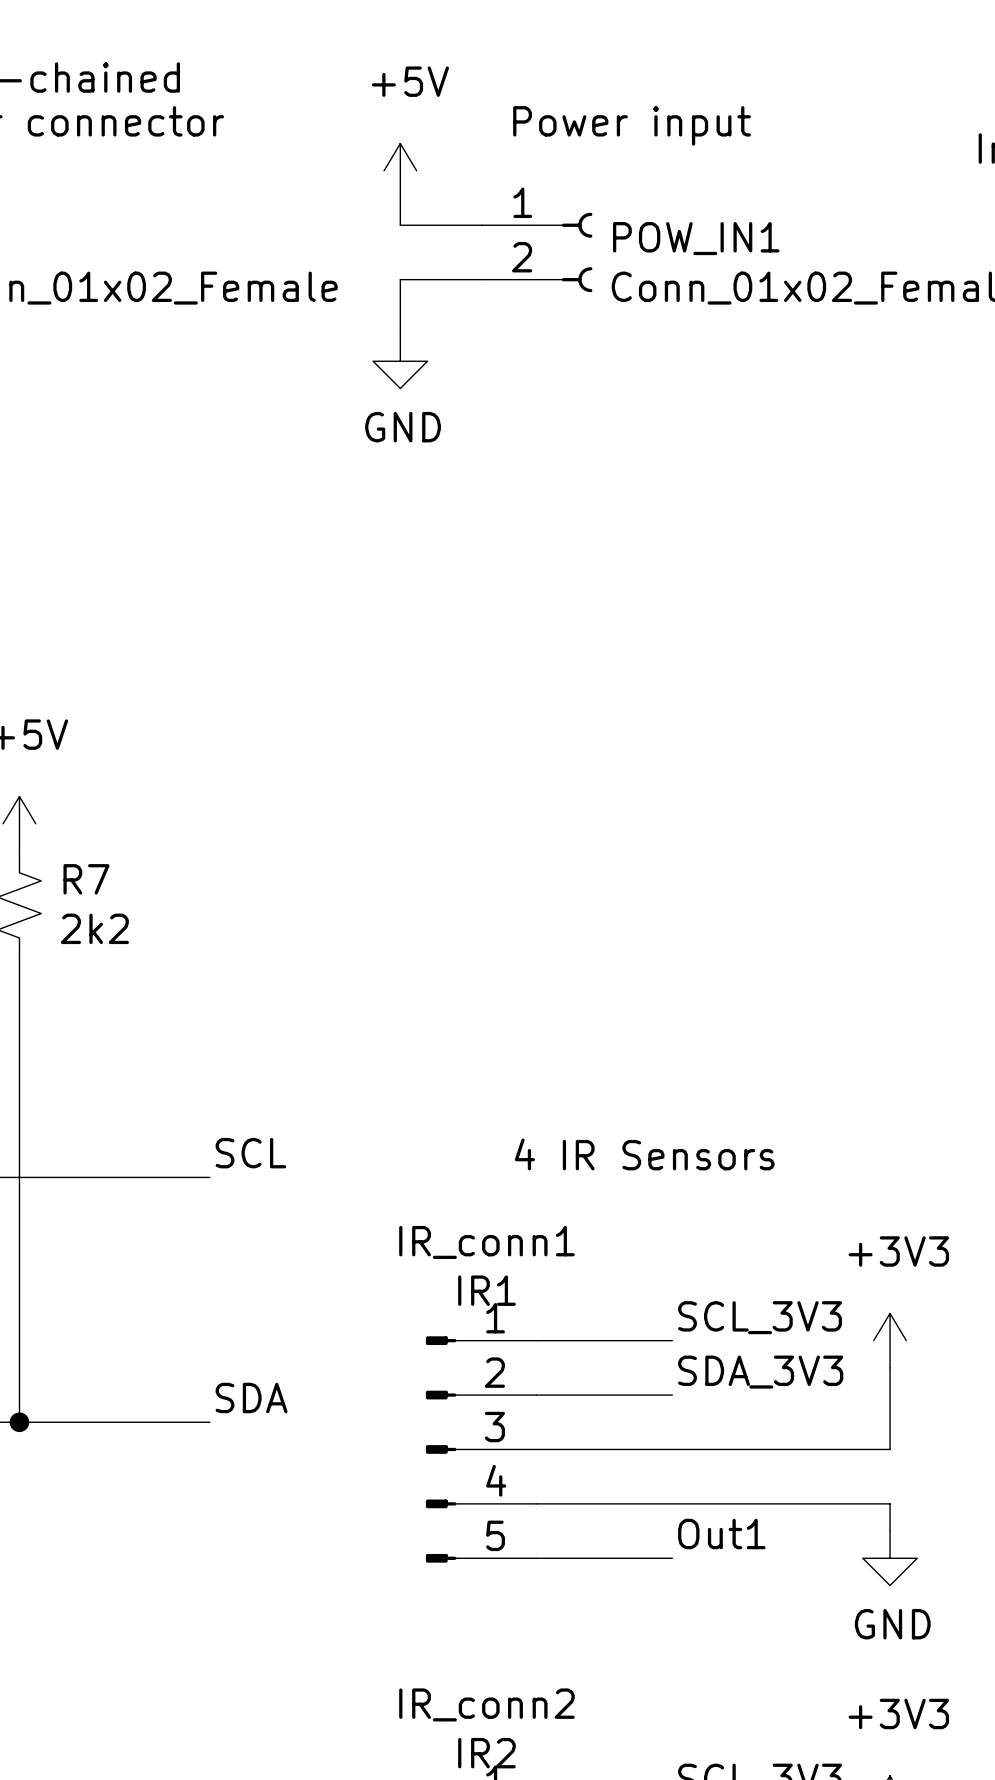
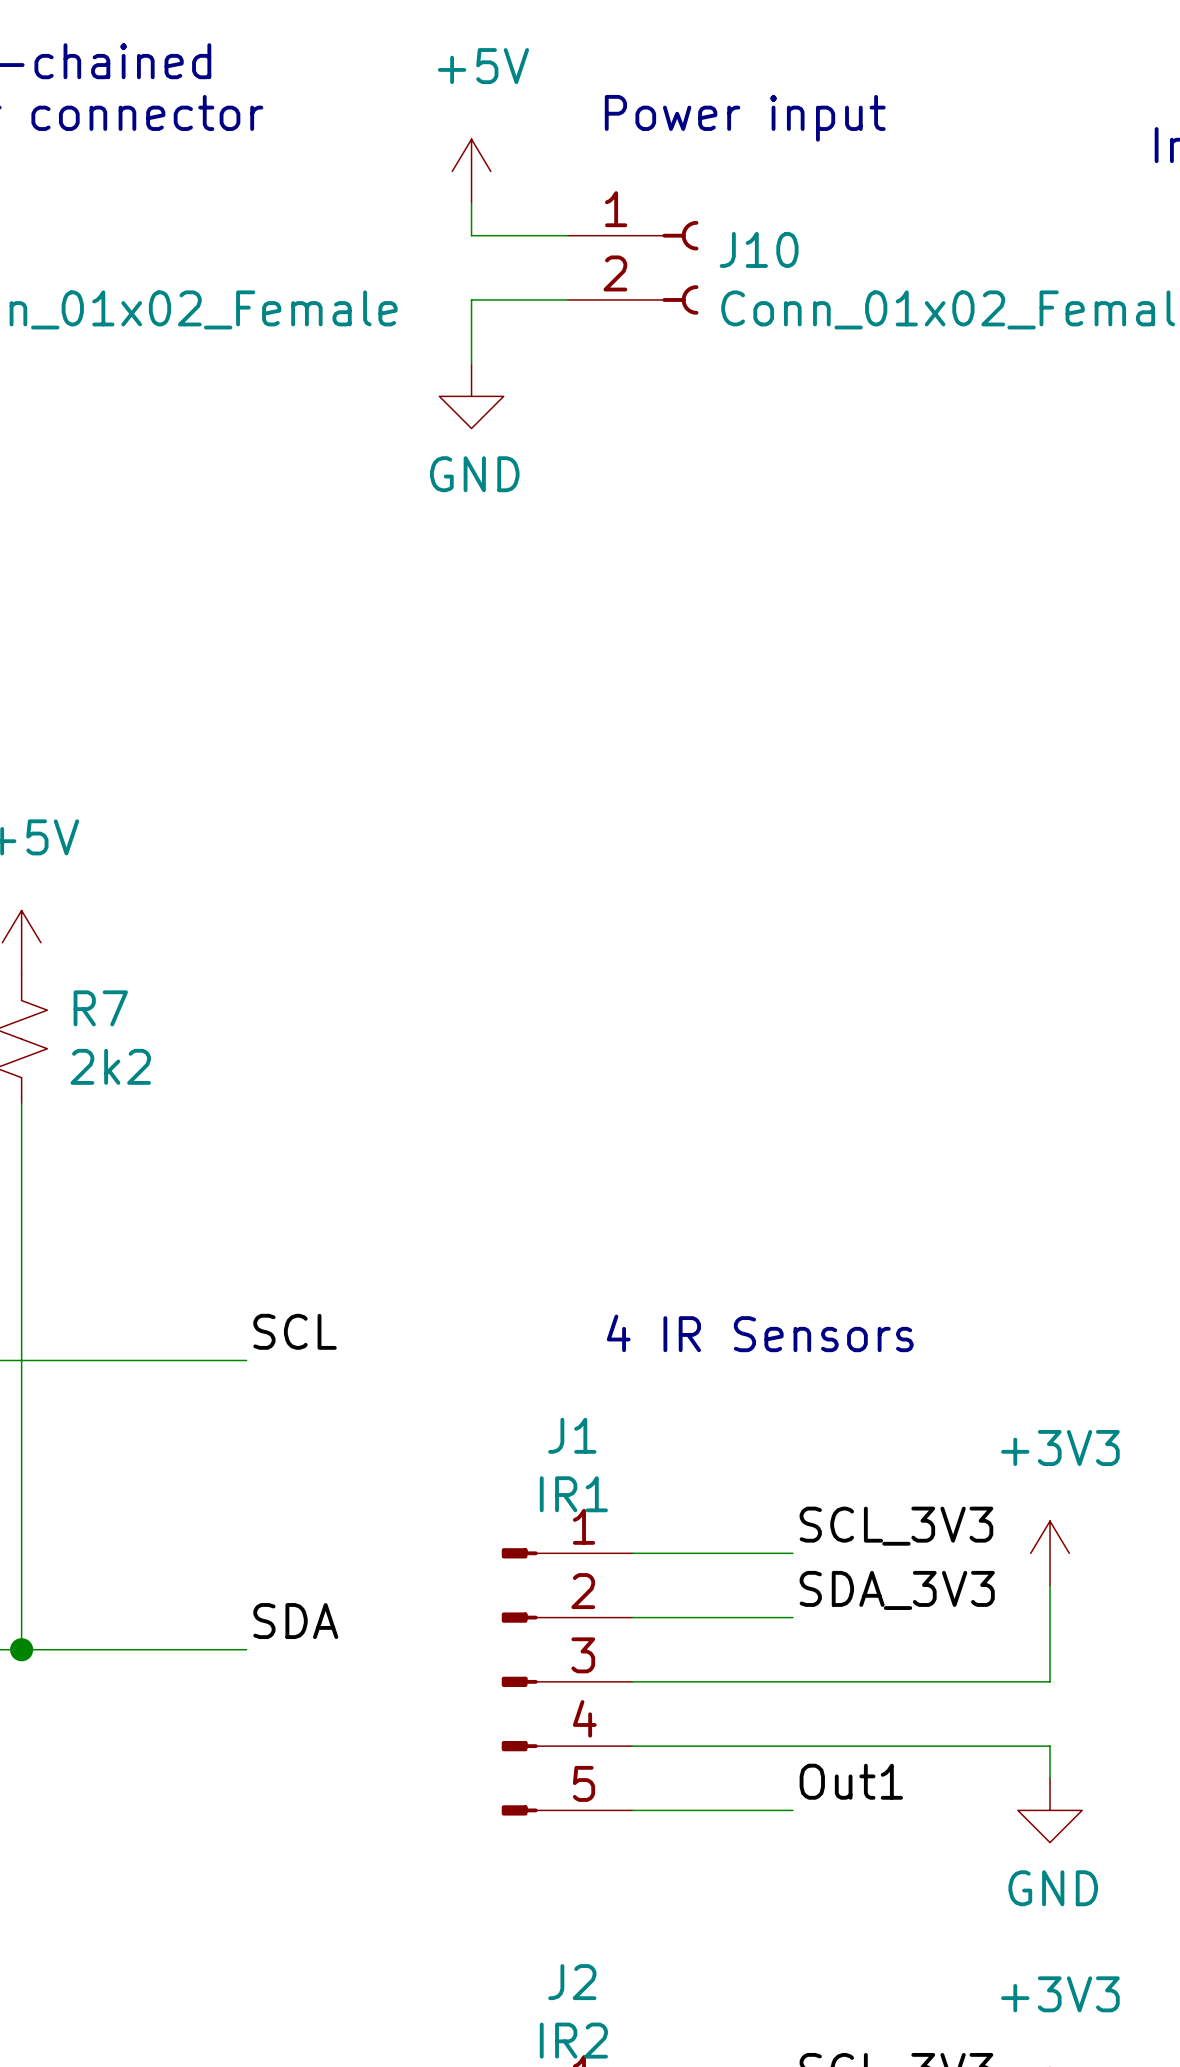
POW_IN1 name: POW_IN1 (696, 238) -> J10 (759, 249)
IR_conn1 name: IR_conn1 (486, 1242) -> J1 (572, 1435)
IR_conn2 name: IR_conn2 (486, 1704) -> J2 (572, 1982)

